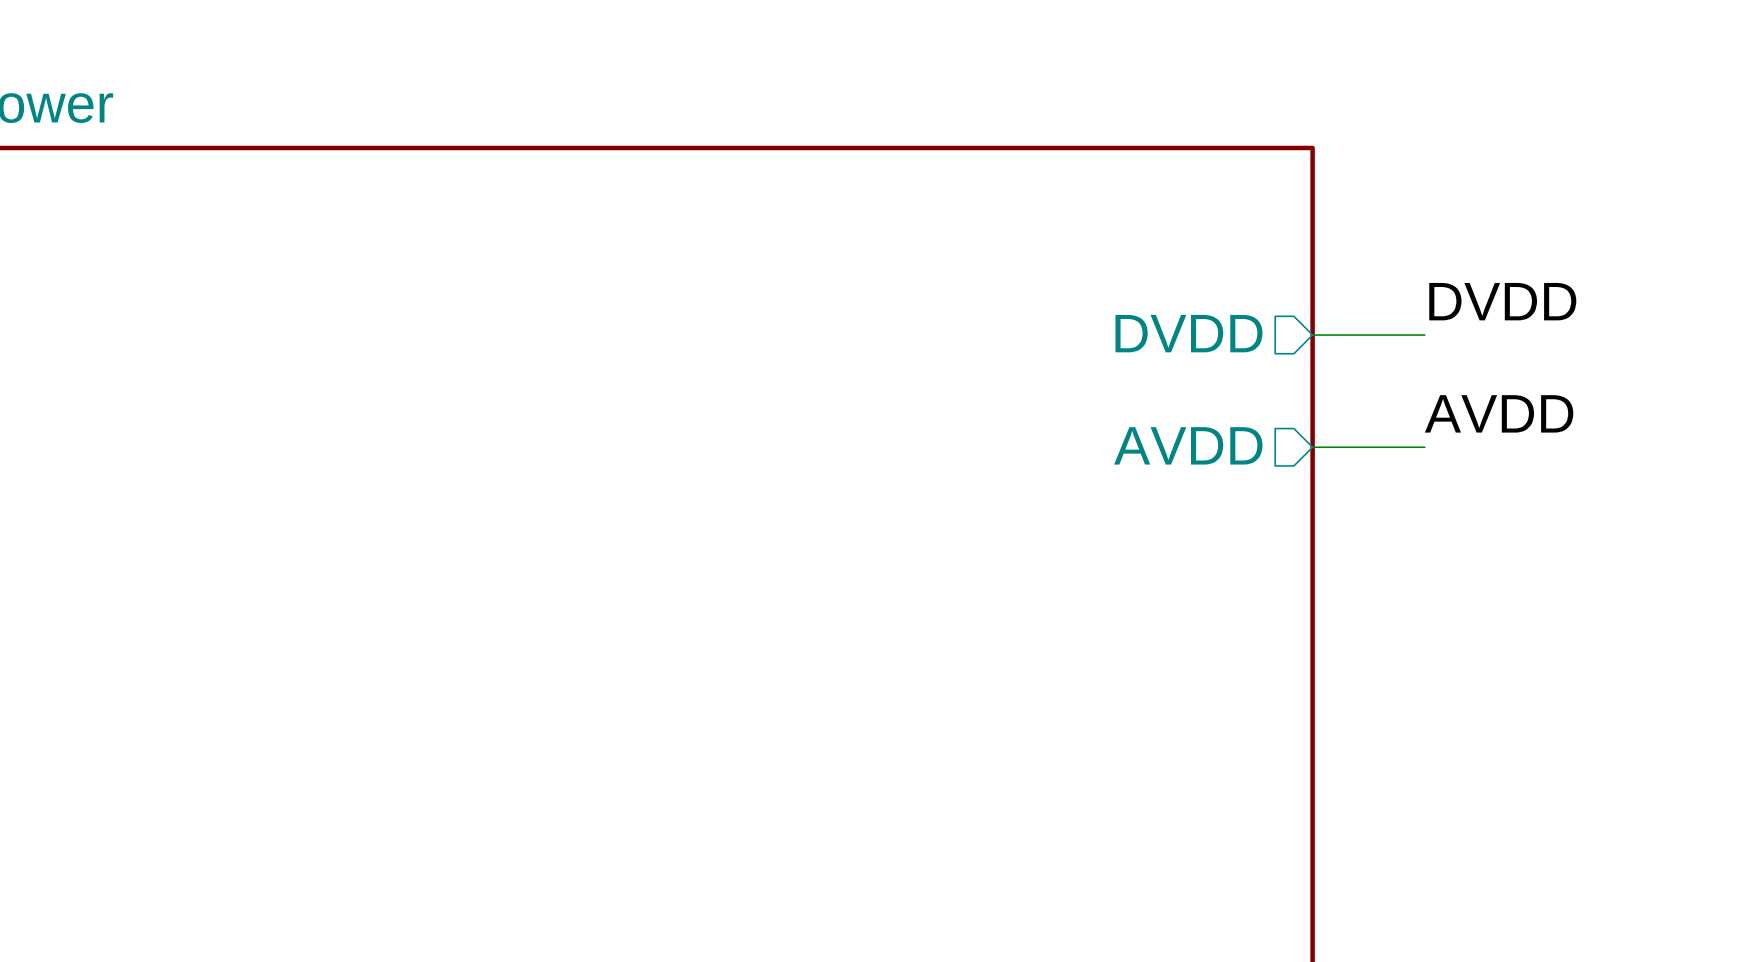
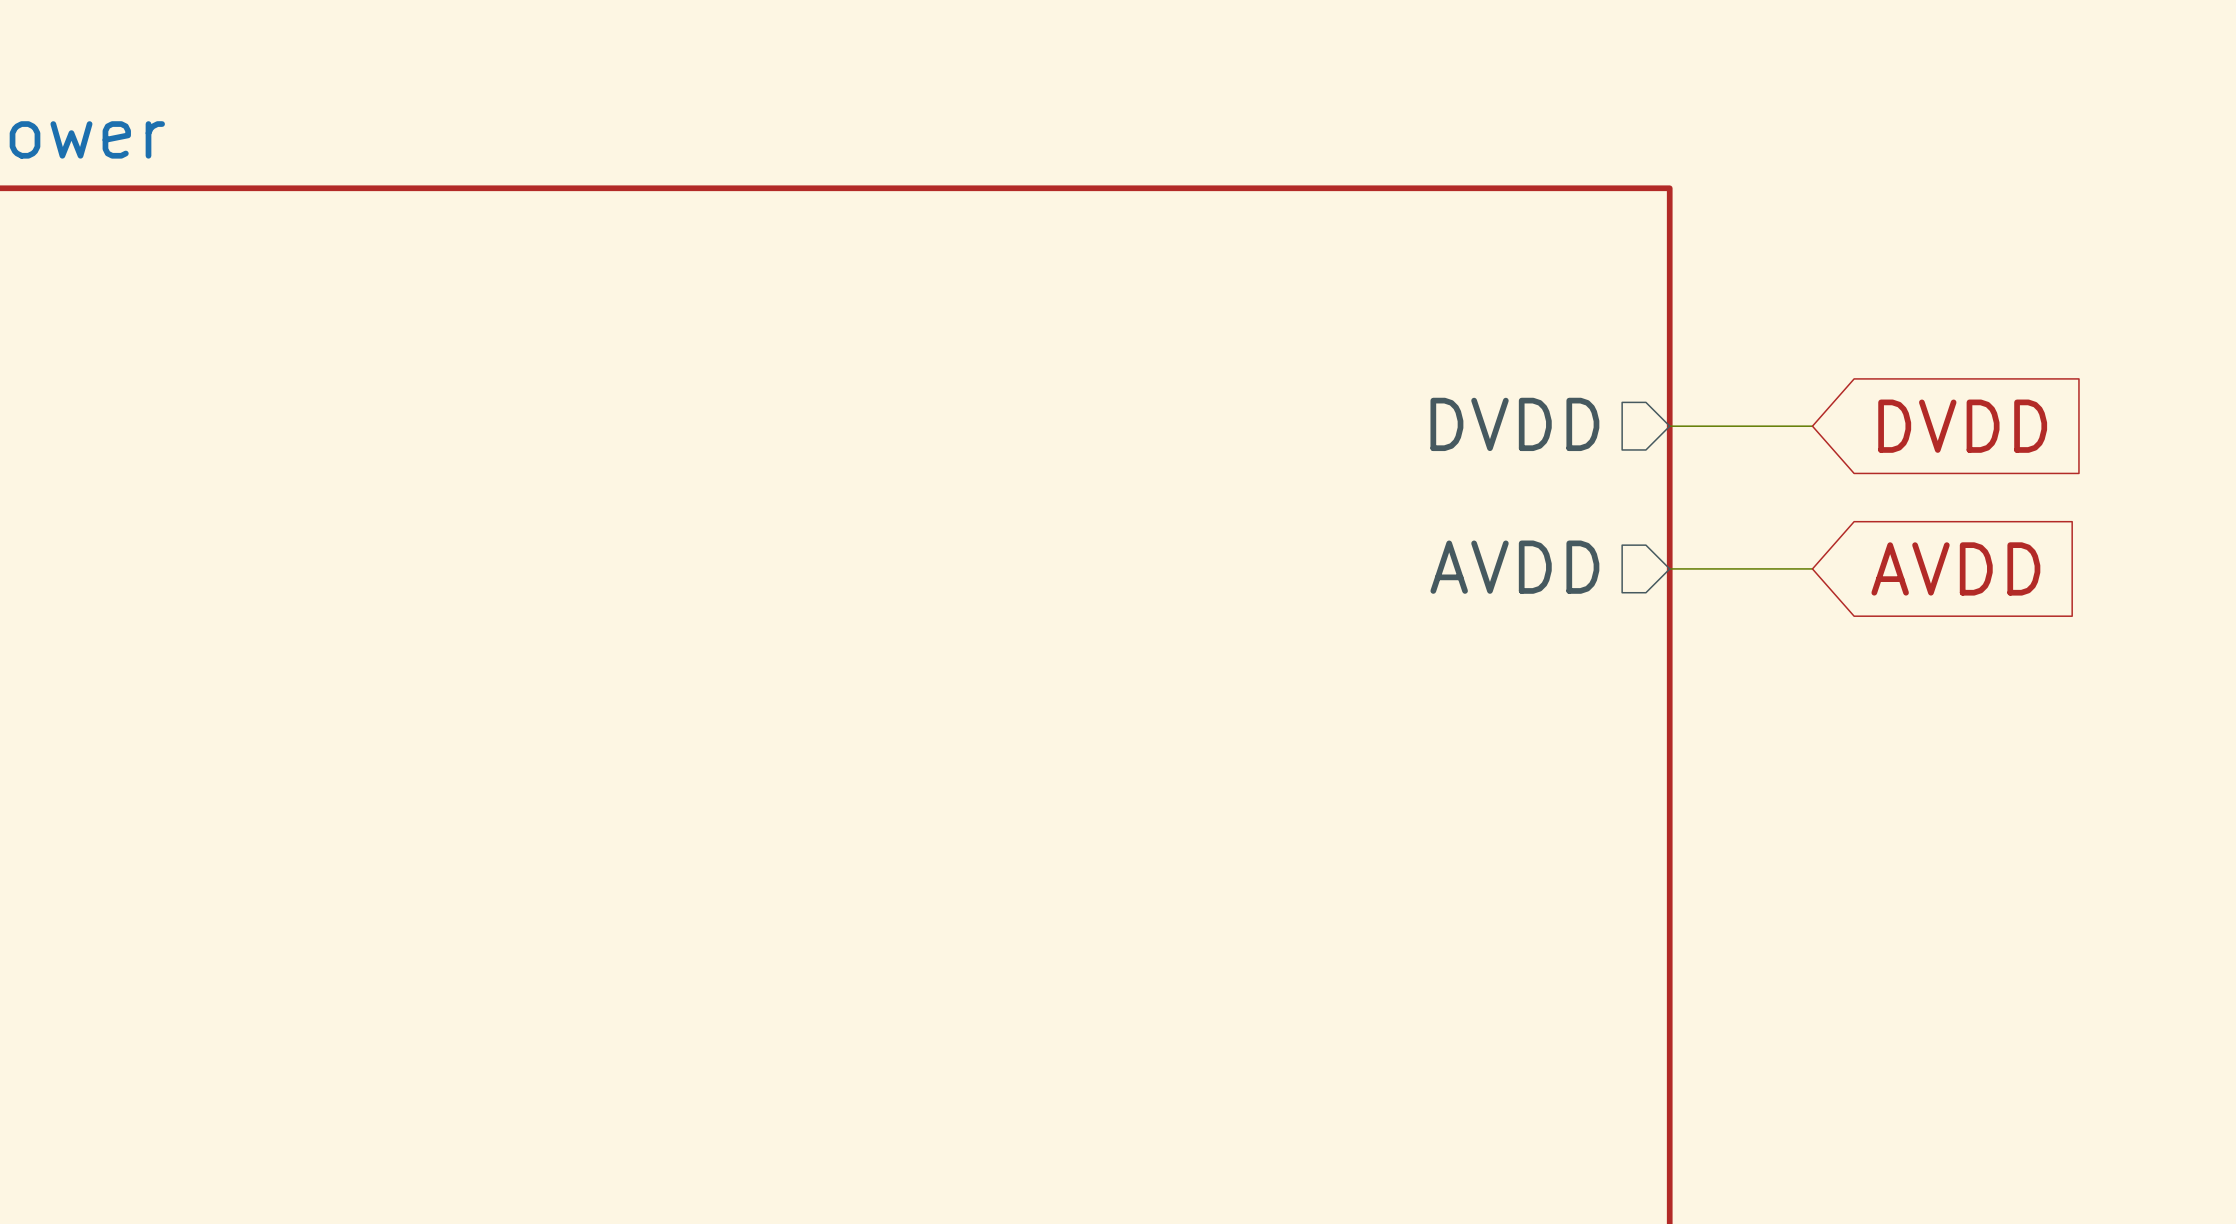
label: DVDD (1502, 301) -> none
global label: none -> DVDD (1962, 426)
label: AVDD (1499, 413) -> none
global label: none -> AVDD (1955, 568)

